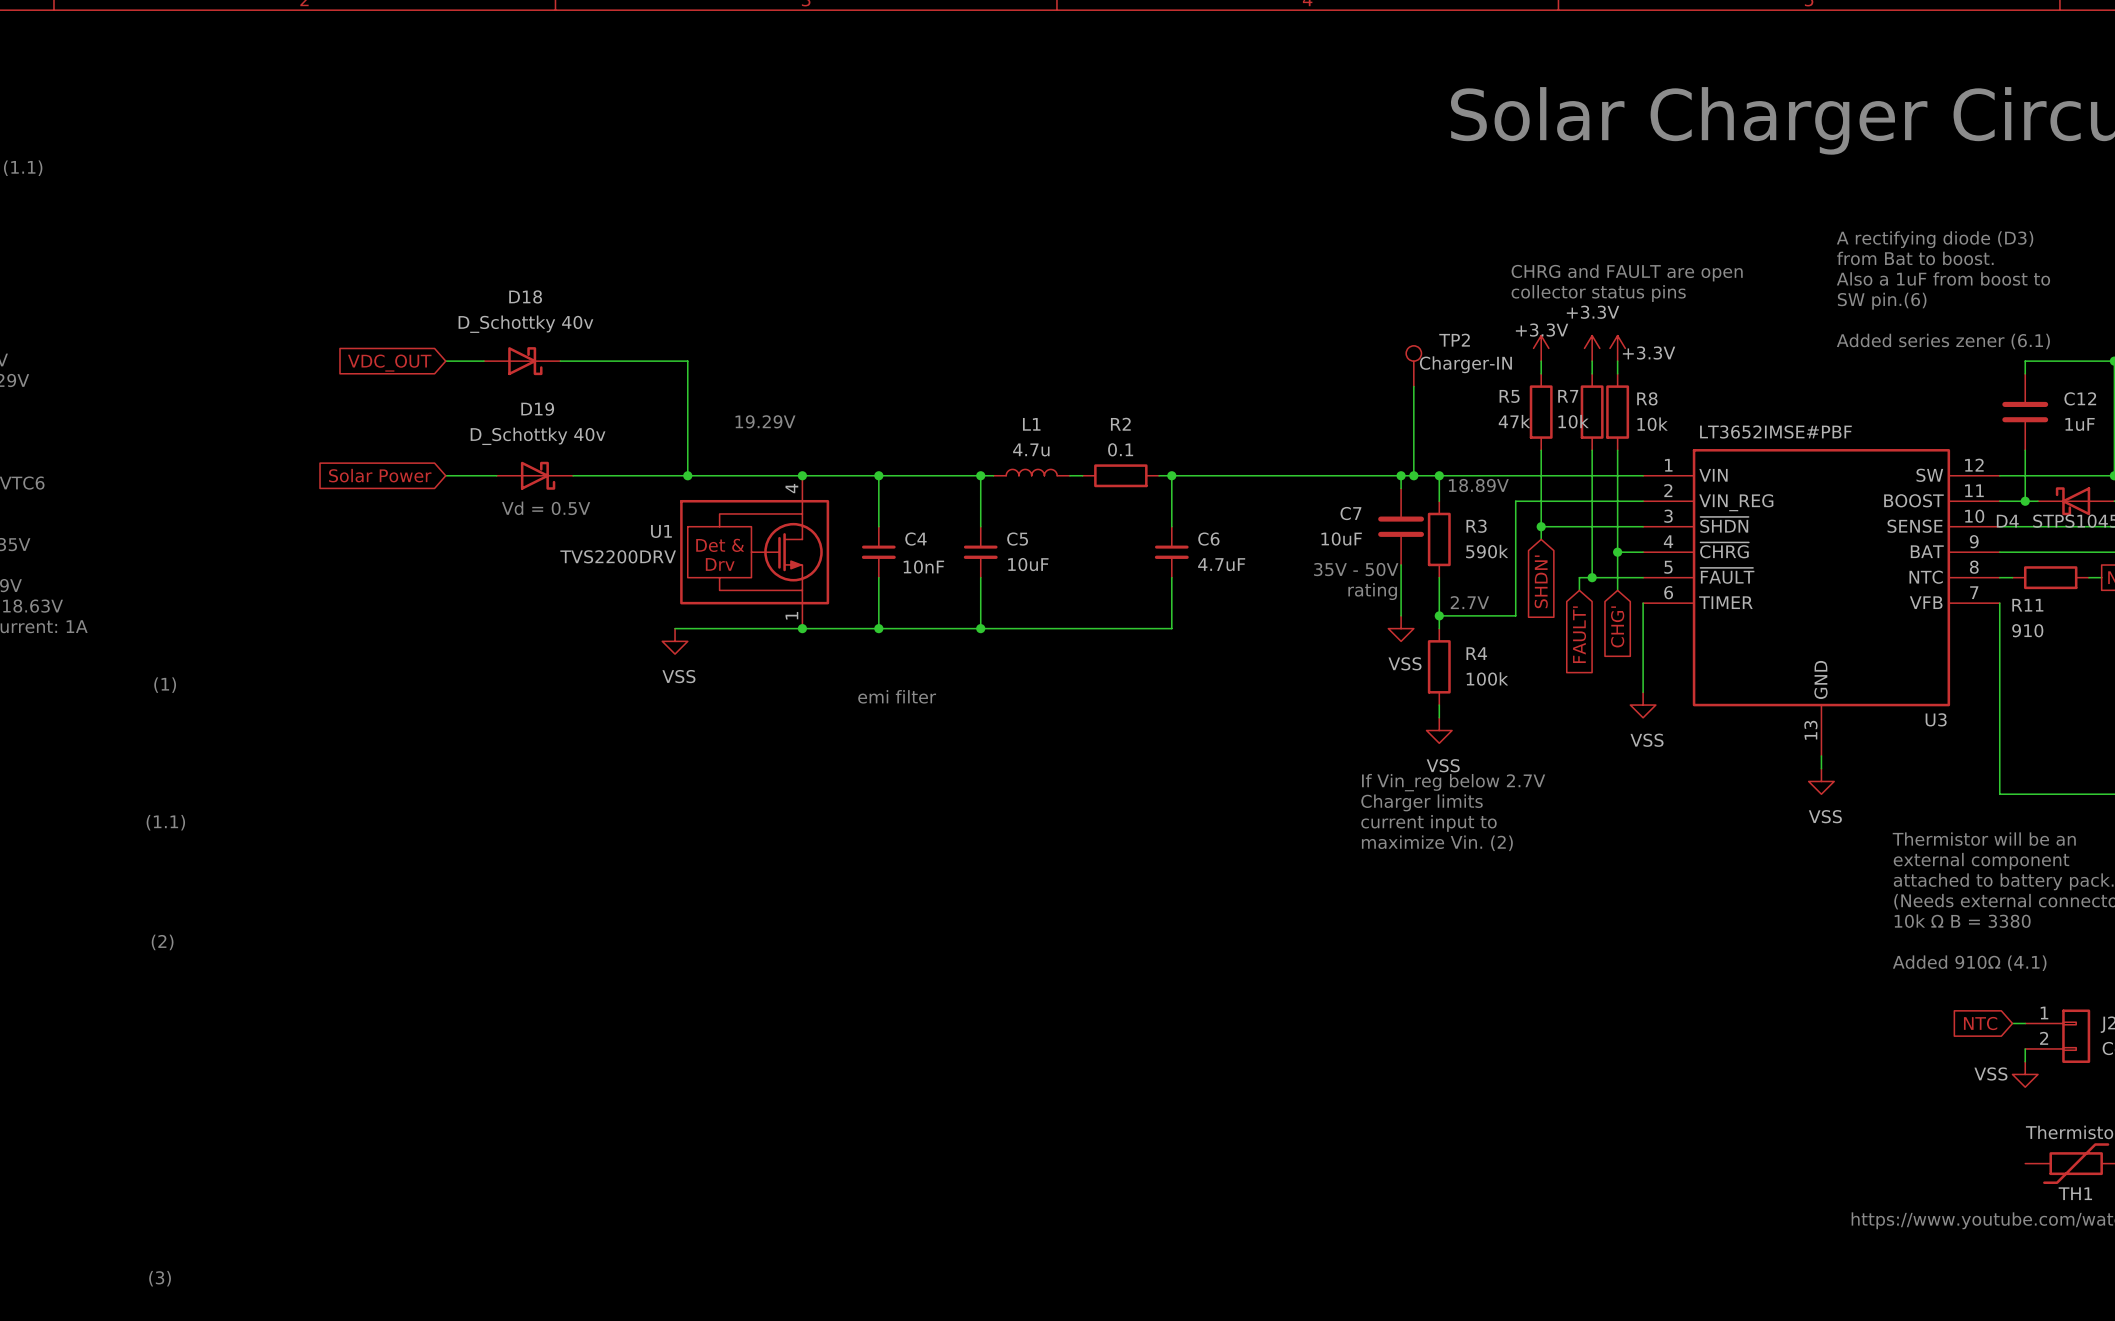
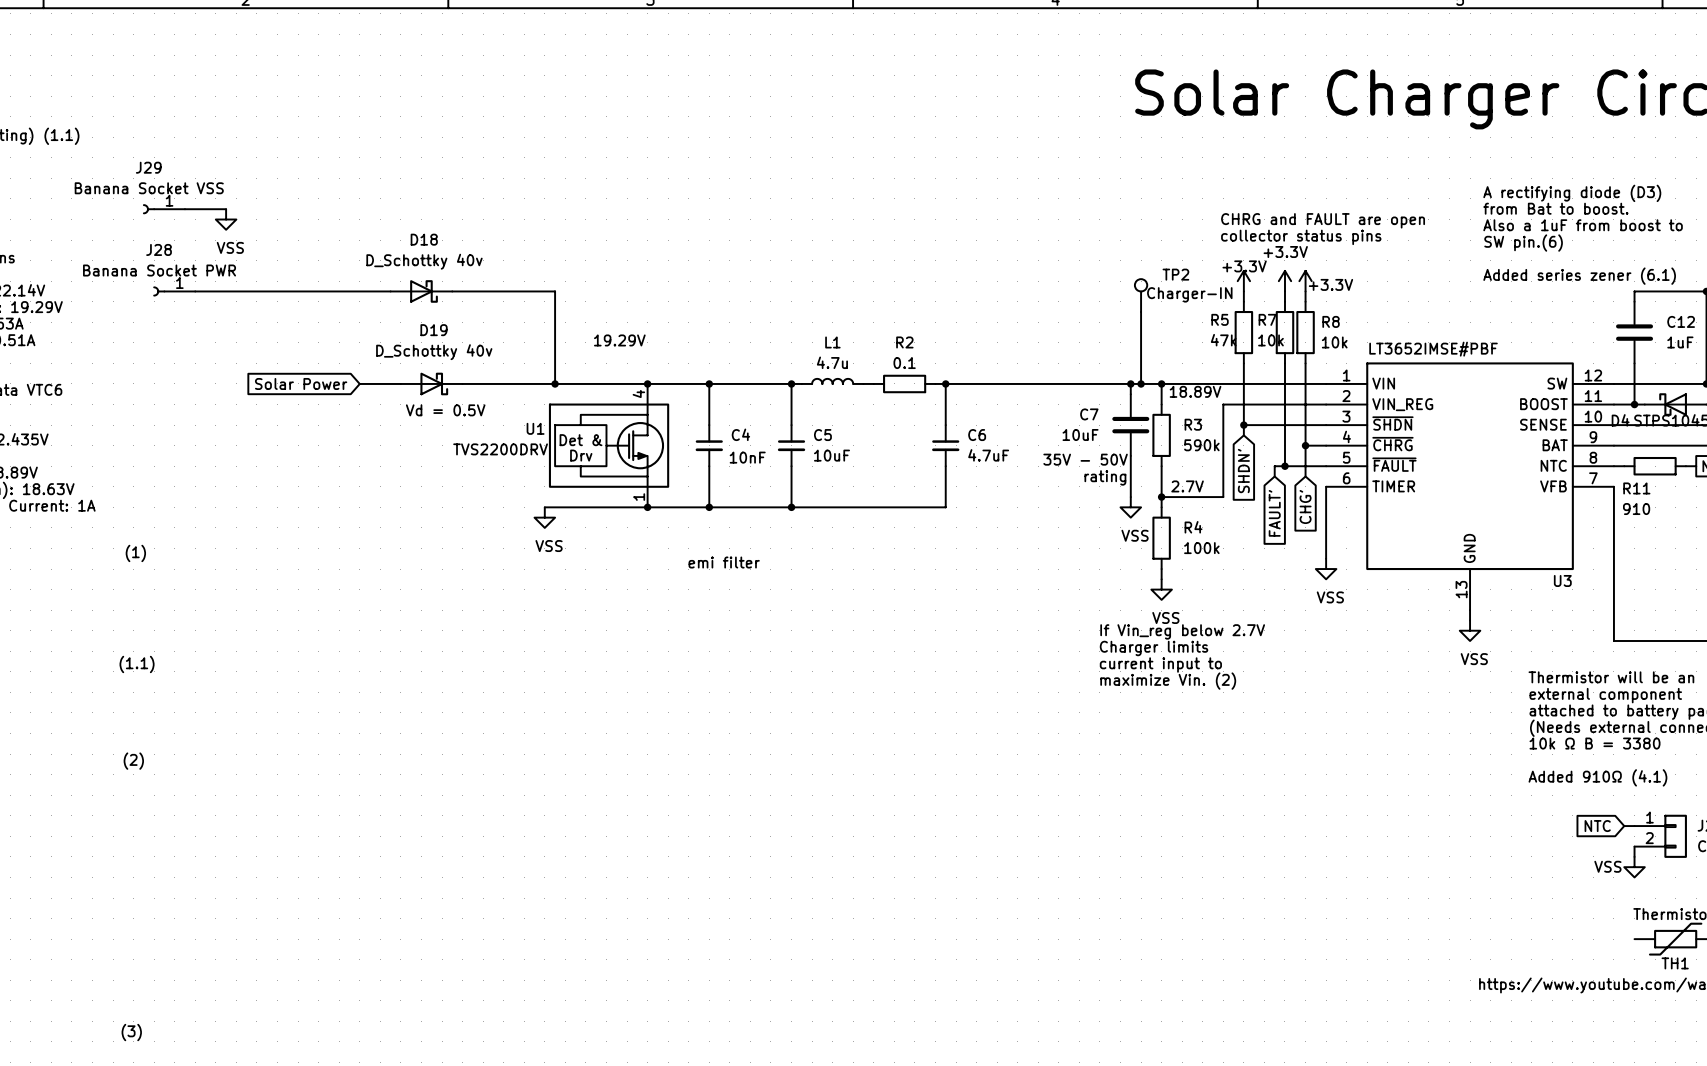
J29: none -> Banana Socket VSS (164, 209)
wire: none -> (184, 209) (226, 209)
power symbol: none -> VSS (226, 219)
J28: none -> Banana Socket PWR (174, 291)
wire: none -> (195, 291) (359, 291)
global label: VDC_OUT (389, 363) -> none

